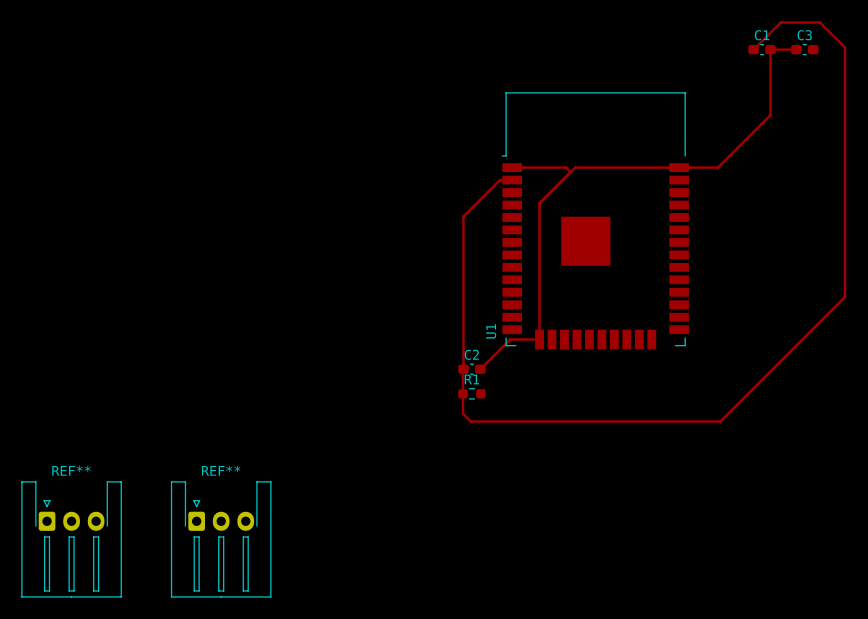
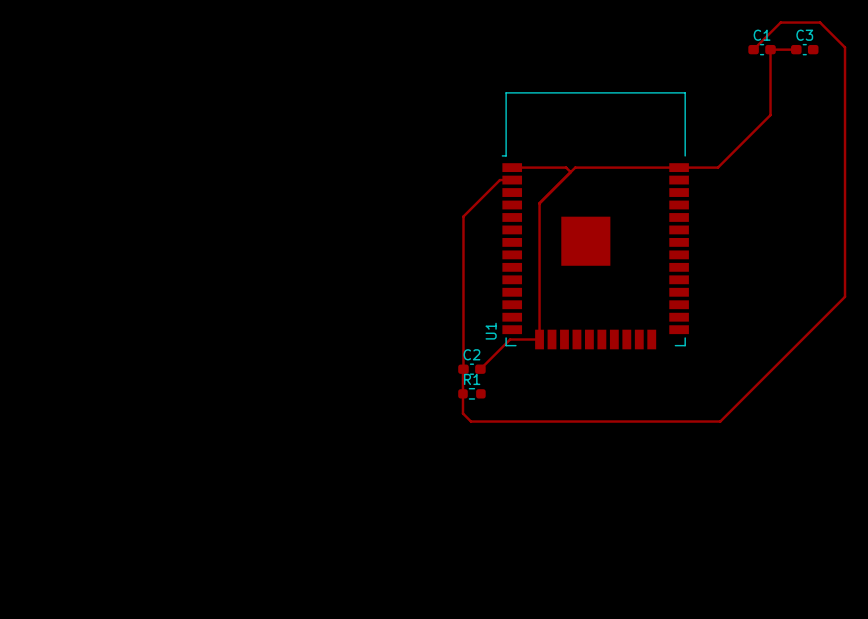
REF**: (71, 539) -> none
REF**: (221, 539) -> none

